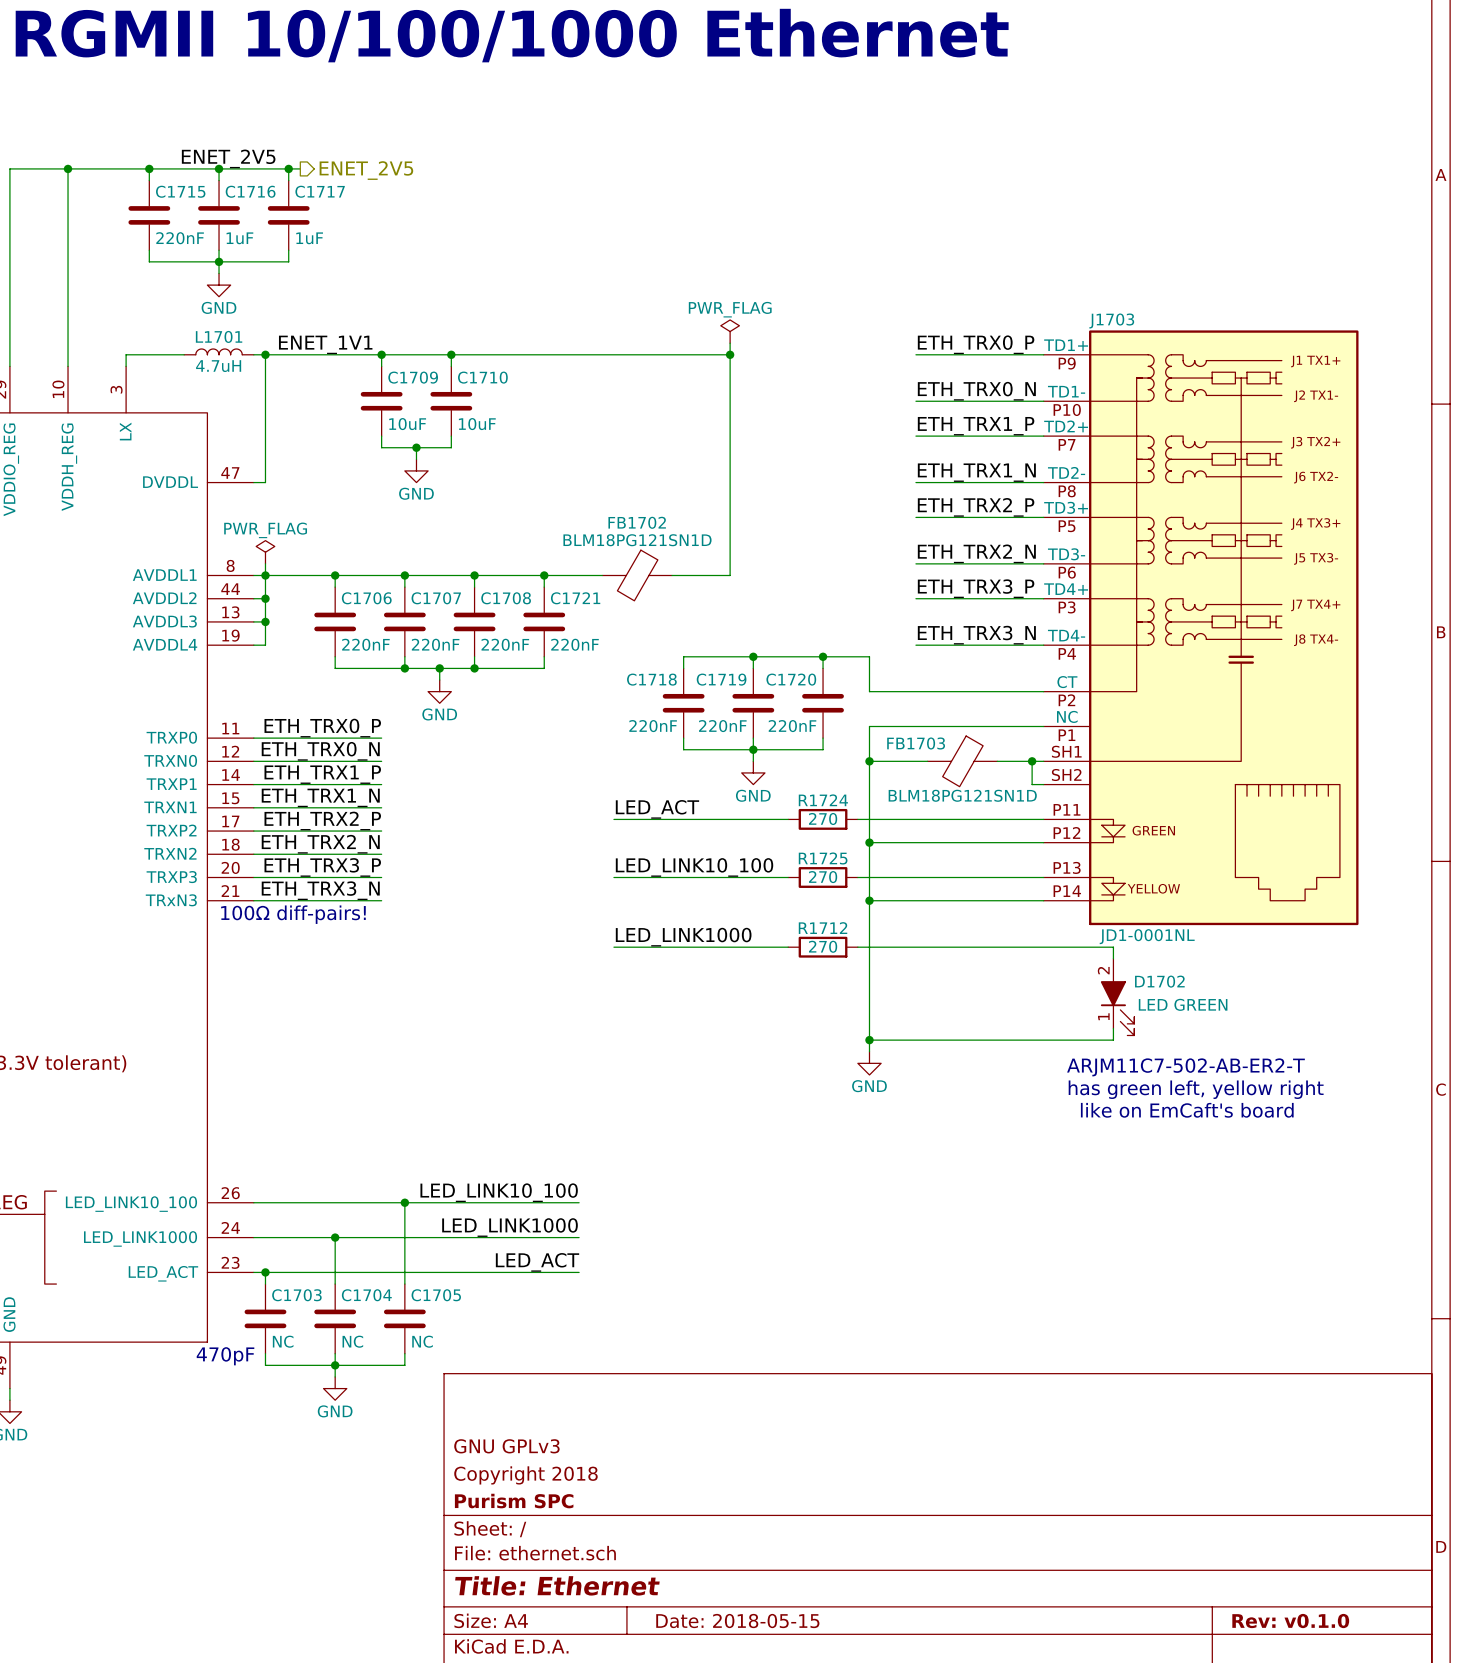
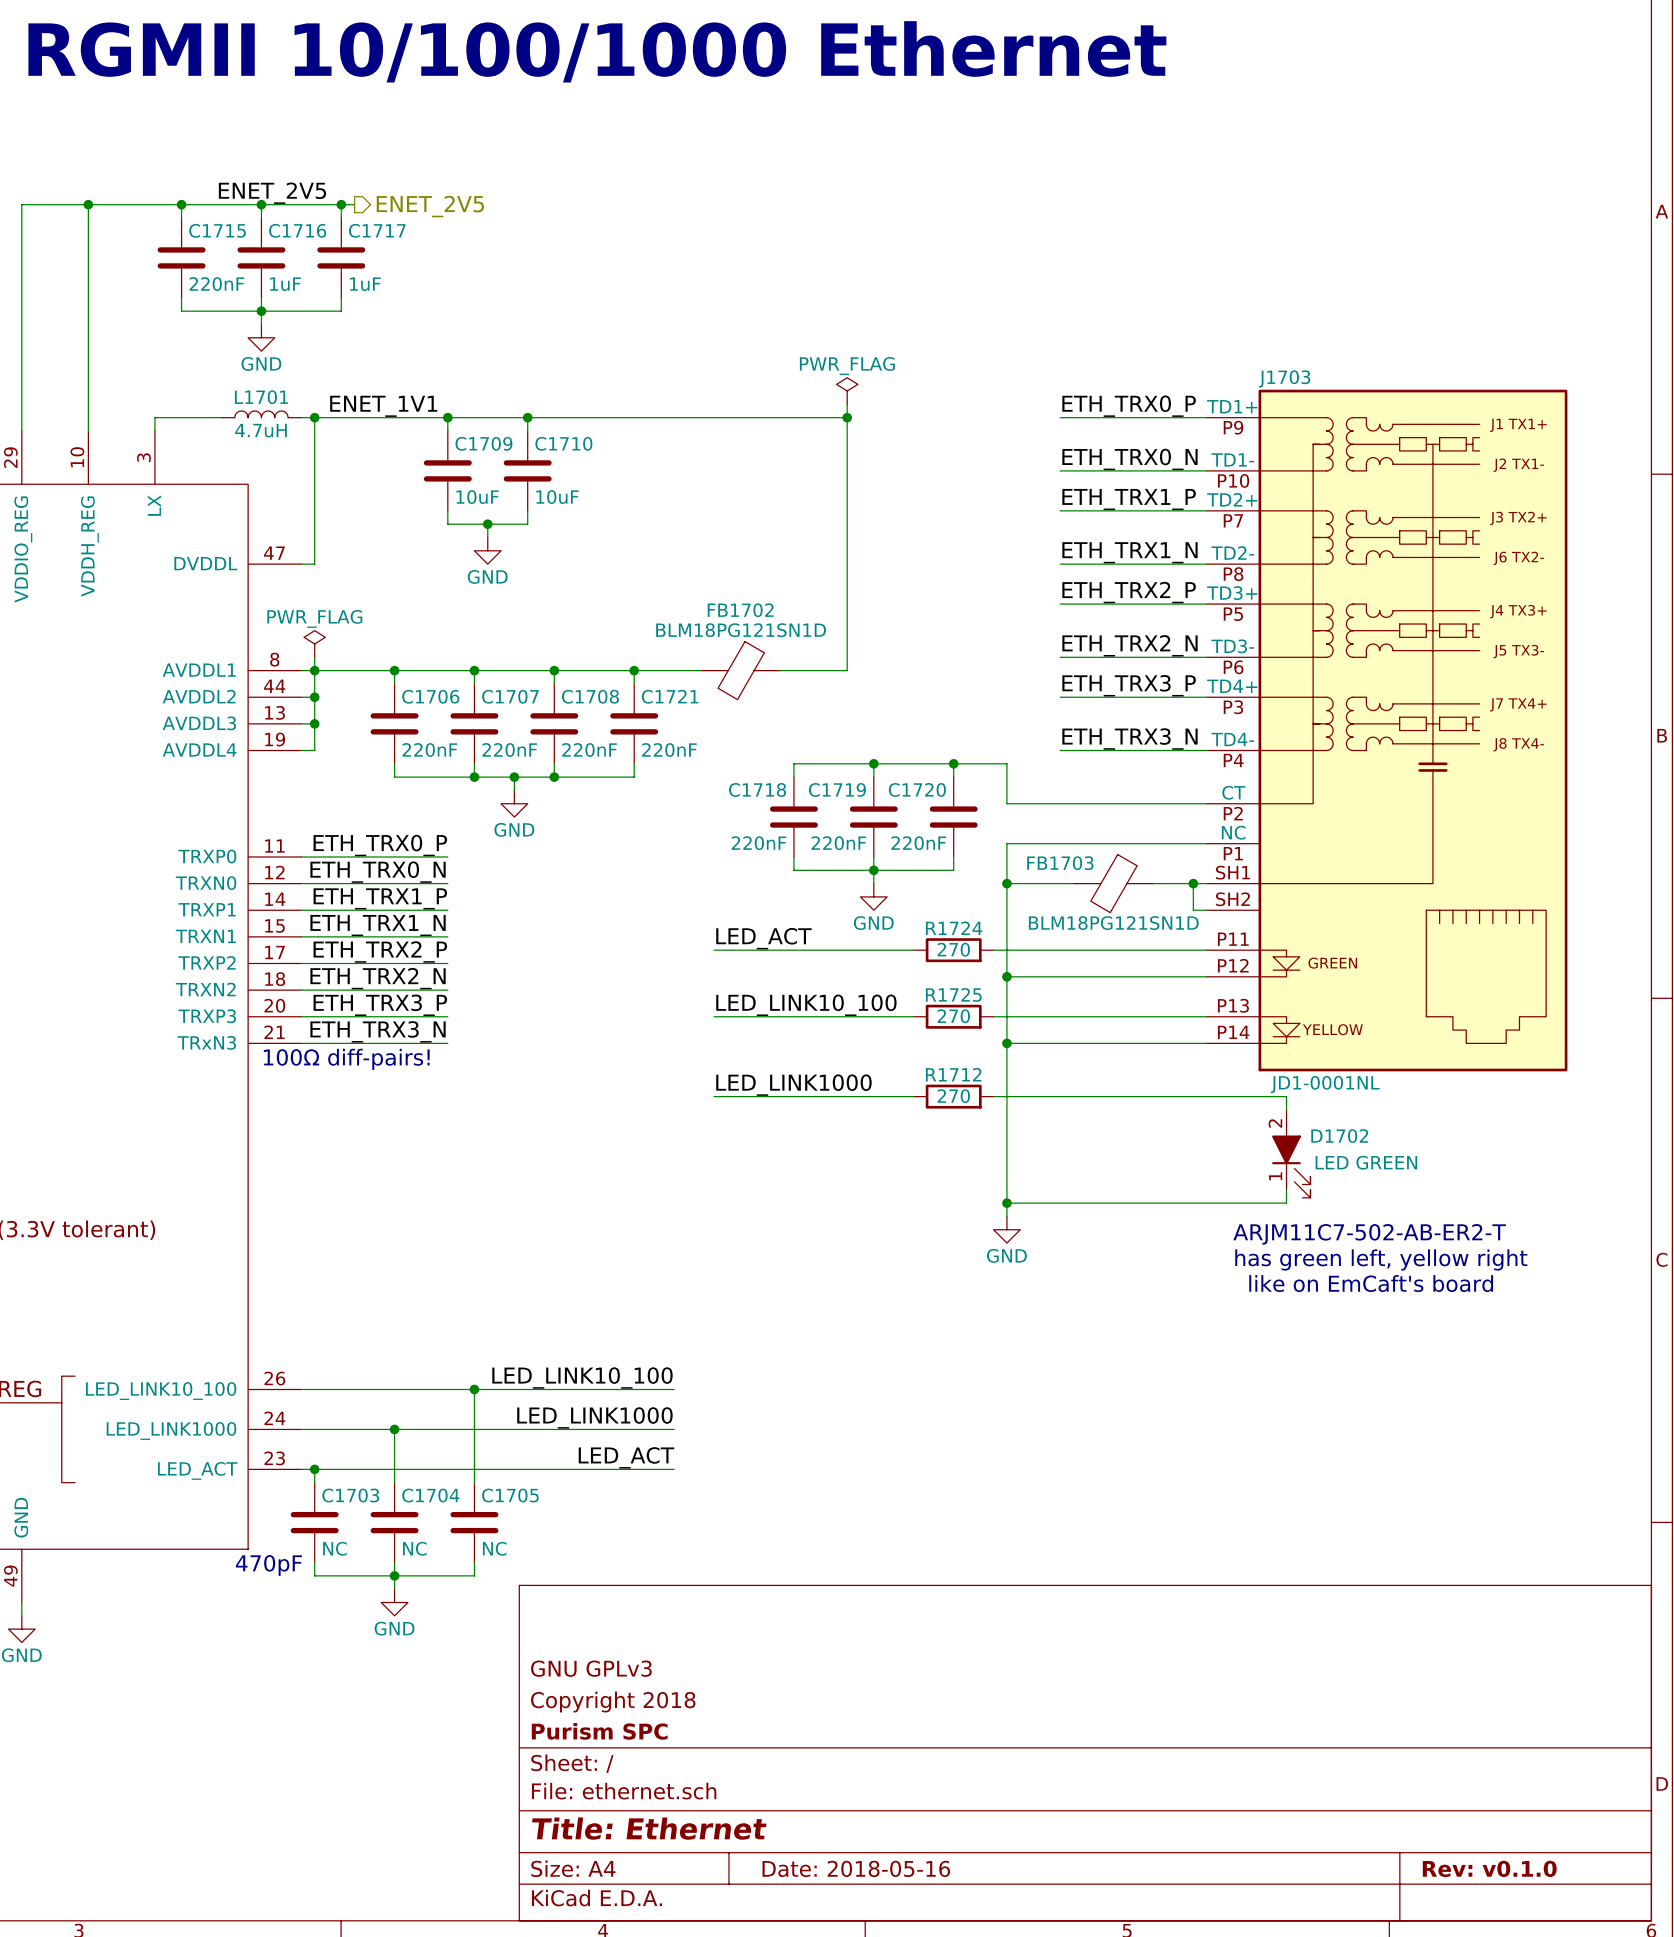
title block: Date: 2018-05-15 (737, 1621) -> Date: 2018-05-16 (856, 1868)

